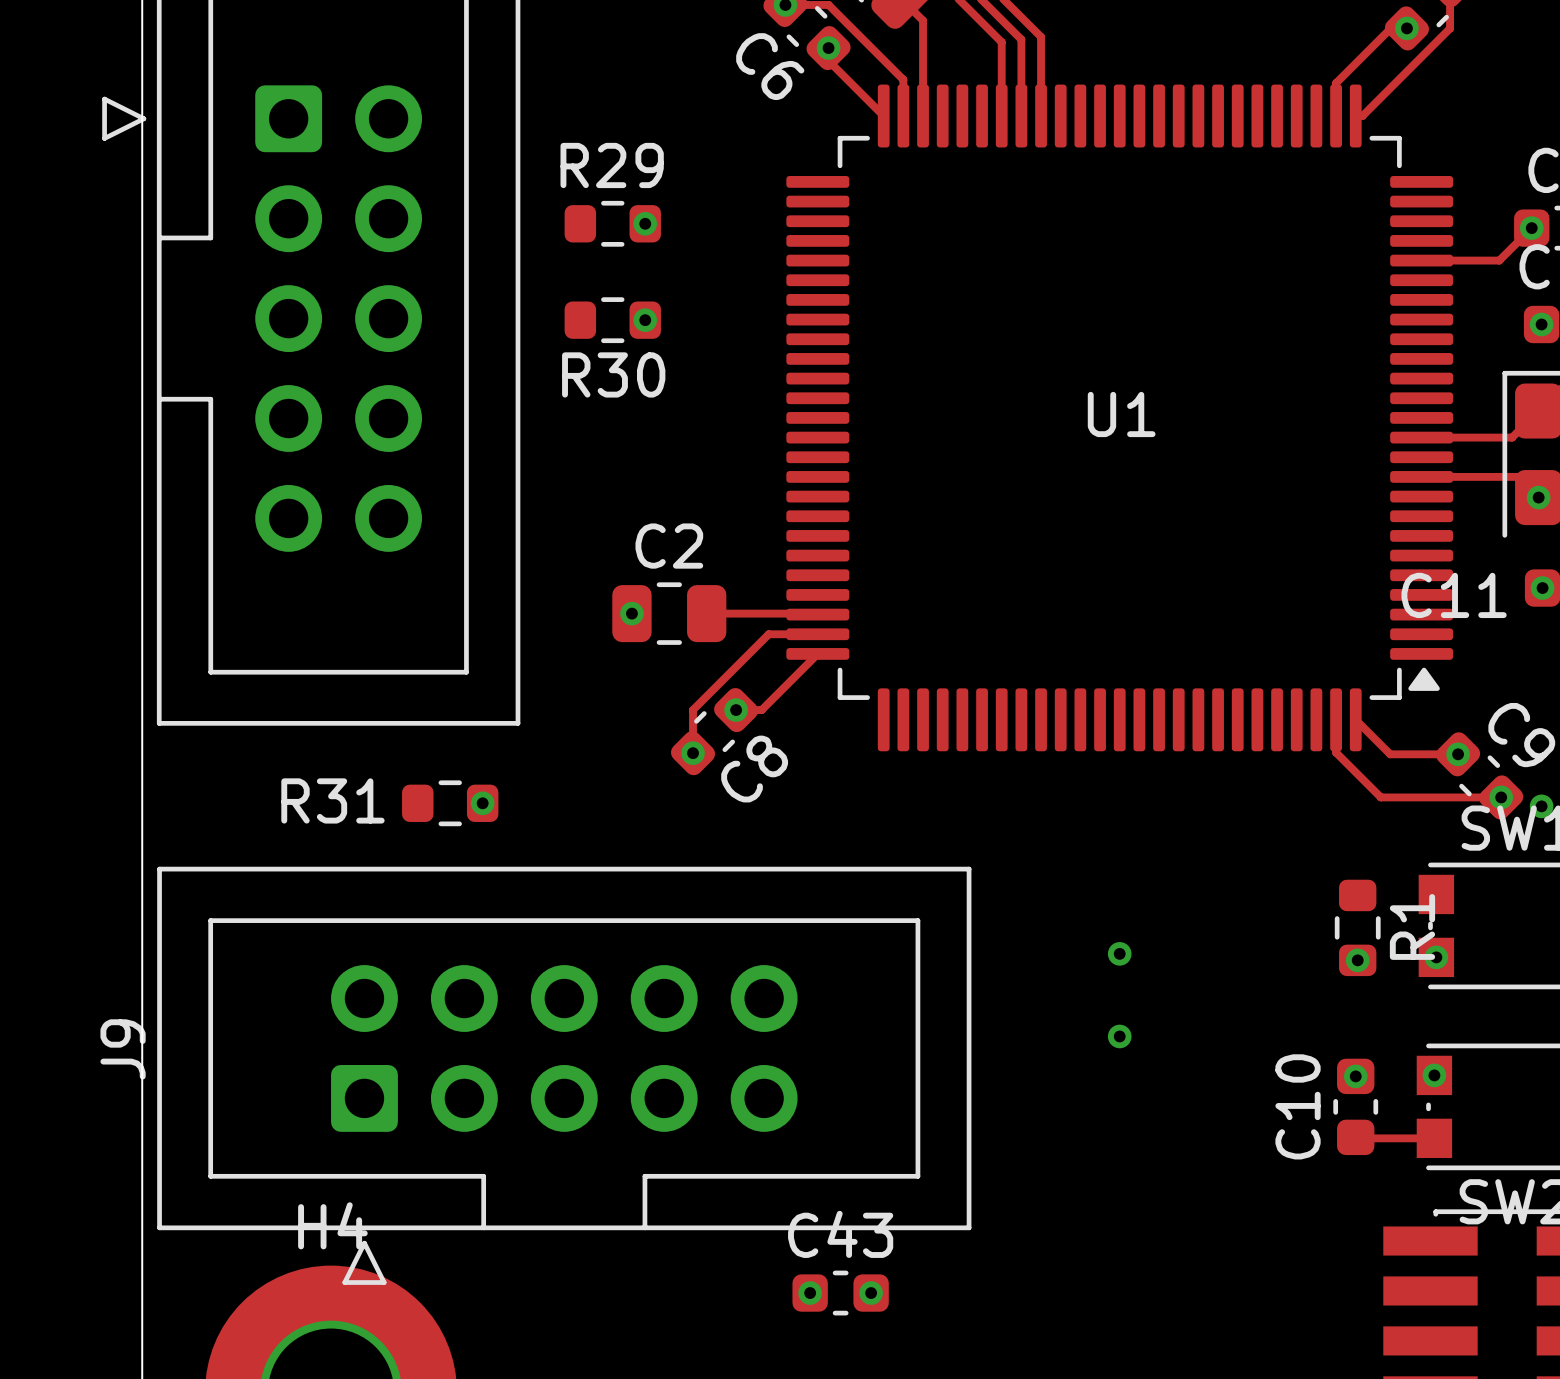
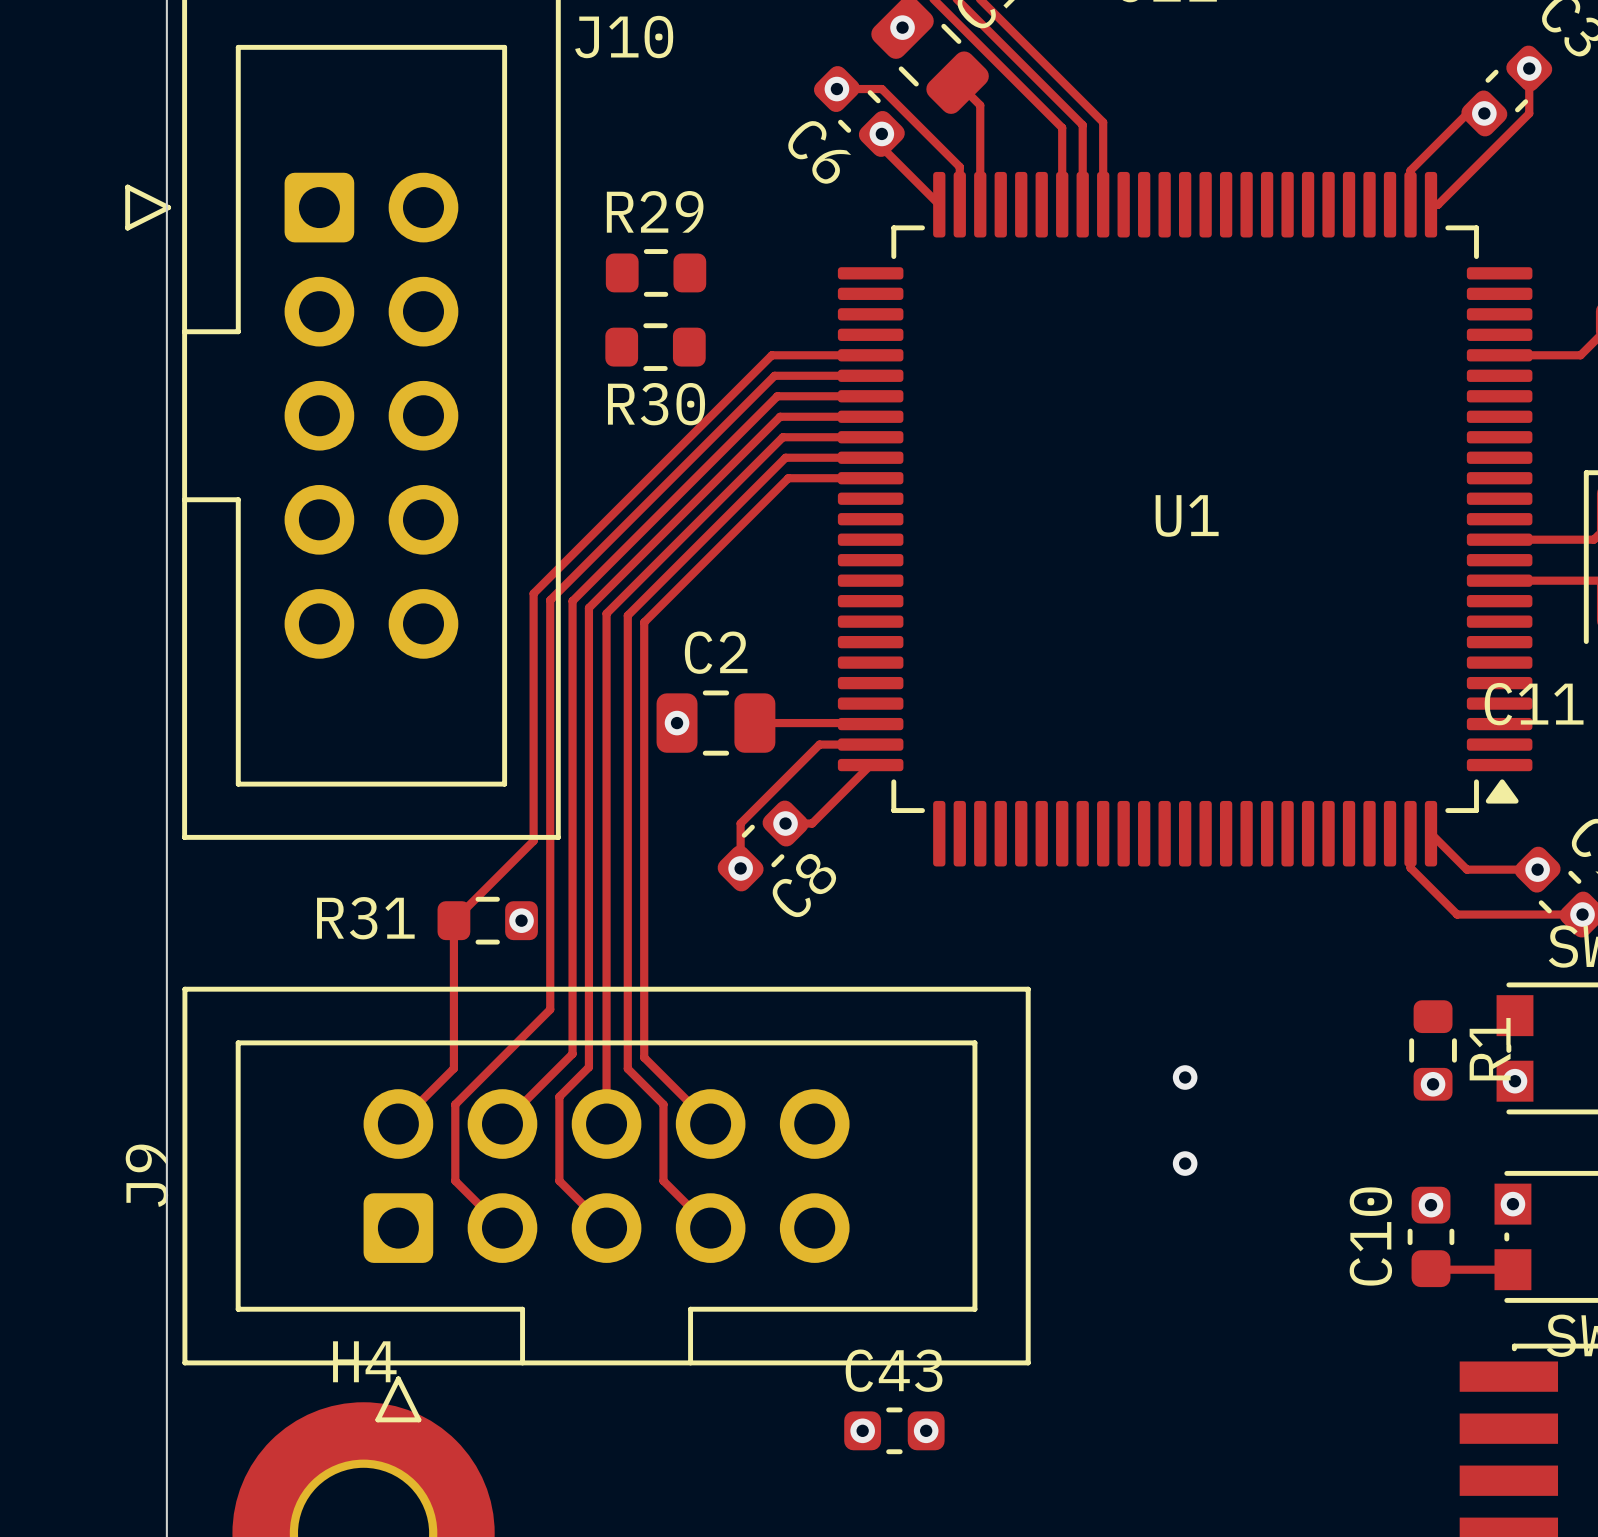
R29 position: (612, 223) -> (656, 272)
via: (645, 223) -> none
track: none -> (870, 355) (771, 355) (533, 593) (533, 840) (453, 920) (453, 1068) (398, 1124)
track: none -> (870, 375) (774, 375) (550, 600) (550, 1009) (455, 1104) (455, 1180) (502, 1228)
track: none -> (870, 396) (777, 396) (572, 601) (572, 1053) (502, 1124)
track: none -> (870, 416) (780, 416) (588, 607) (588, 1067) (559, 1096) (559, 1180) (606, 1228)
R30 position: (612, 320) -> (655, 347)
via: (645, 320) -> none
track: none -> (870, 437) (782, 437) (606, 613) (606, 1124)
track: none -> (870, 457) (785, 457) (627, 615) (627, 1068) (663, 1104) (663, 1180) (710, 1228)
track: none -> (870, 478) (788, 478) (644, 622) (644, 1057) (710, 1124)

